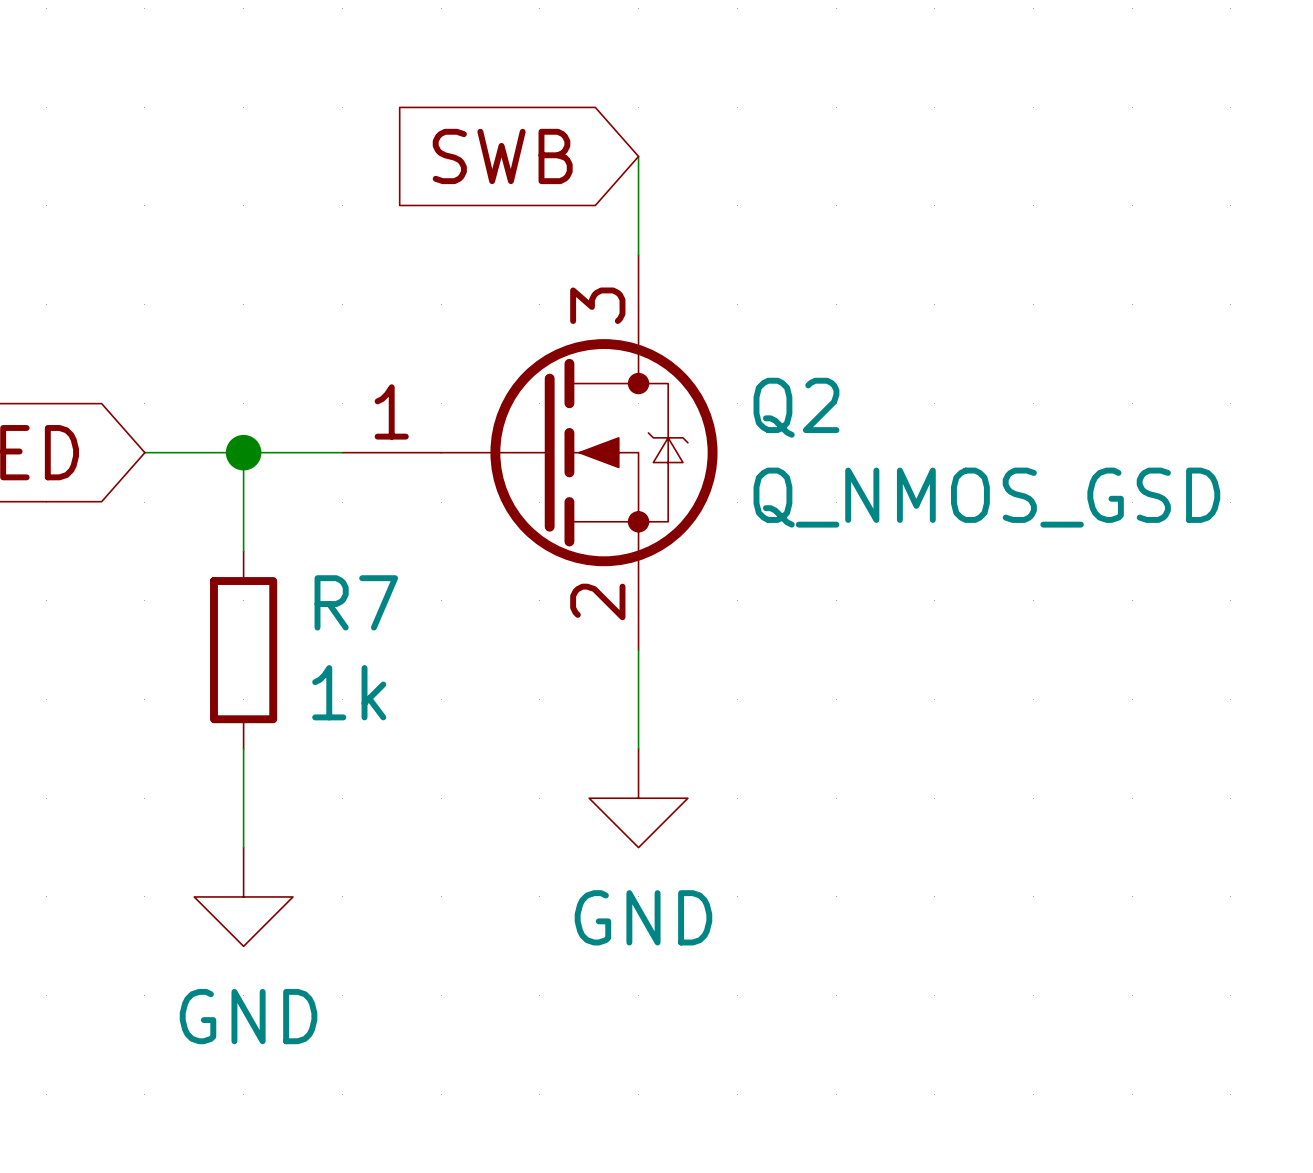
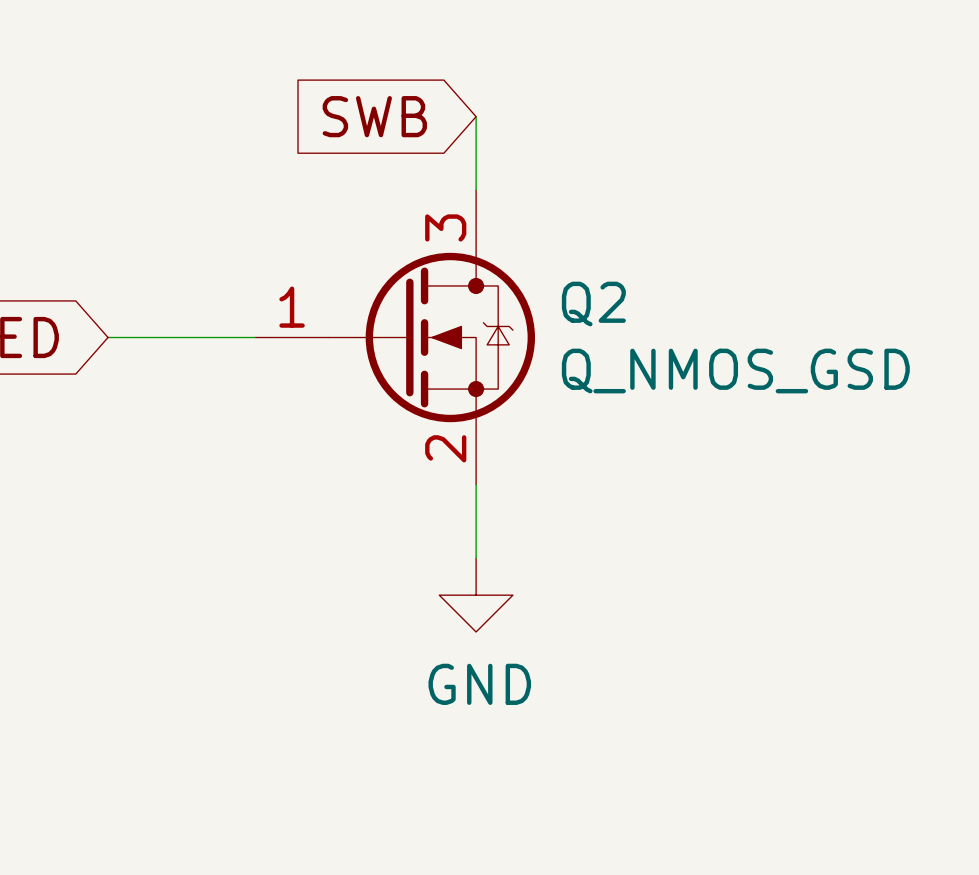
wire: (243, 452) (243, 551) -> none
junction: (243, 452) -> none
R7: 1k (243, 650) -> none
wire: (243, 748) (243, 847) -> none
power symbol: GND (243, 896) -> none

